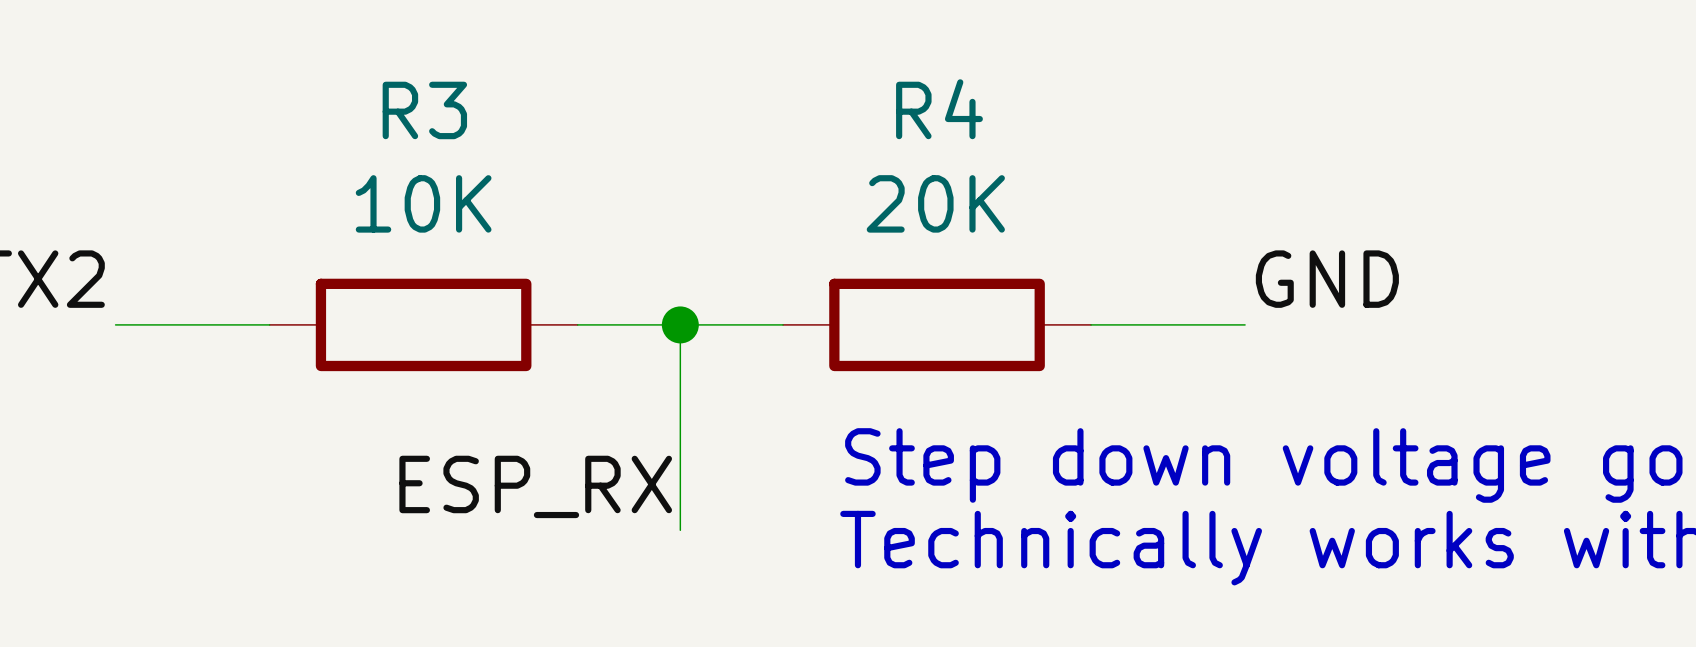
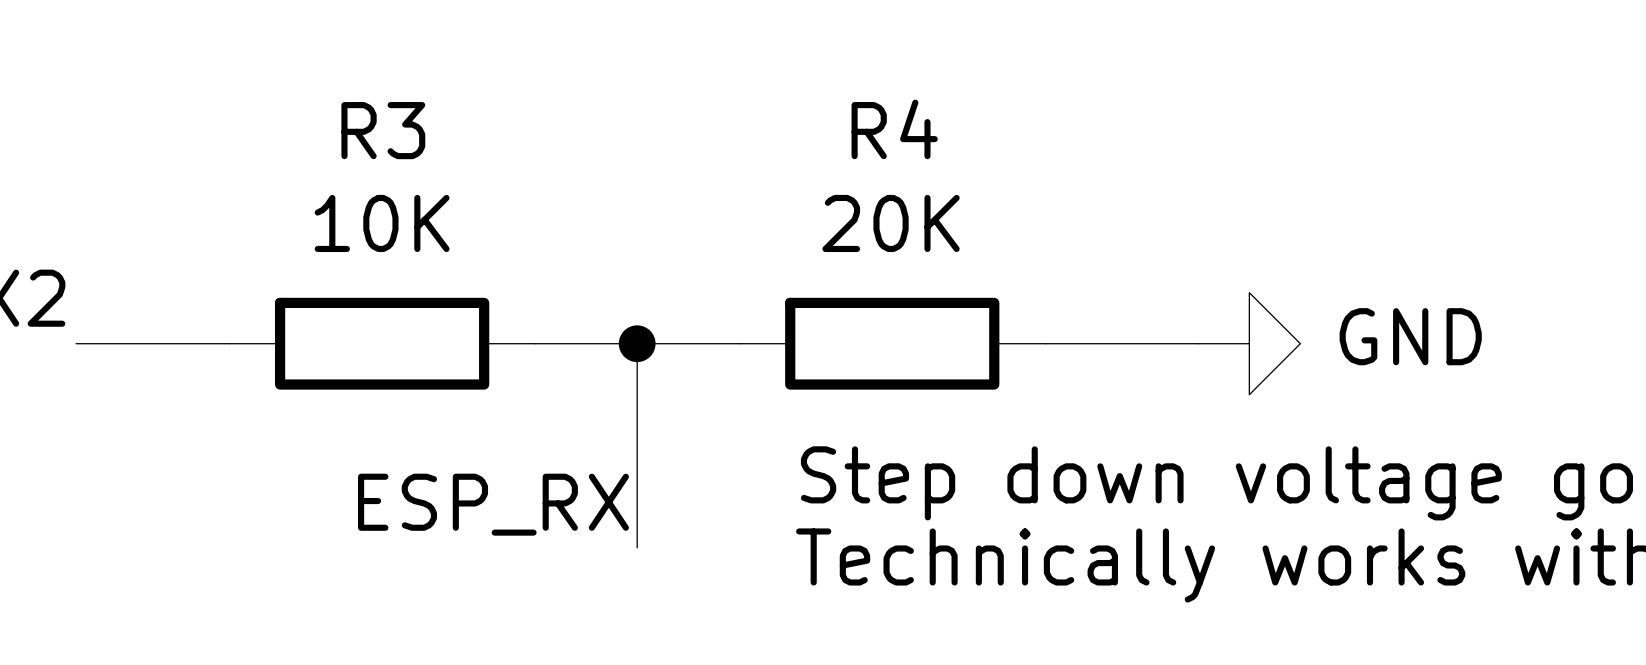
label: GND (1327, 279) -> none
power symbol: none -> GND (1249, 343)

